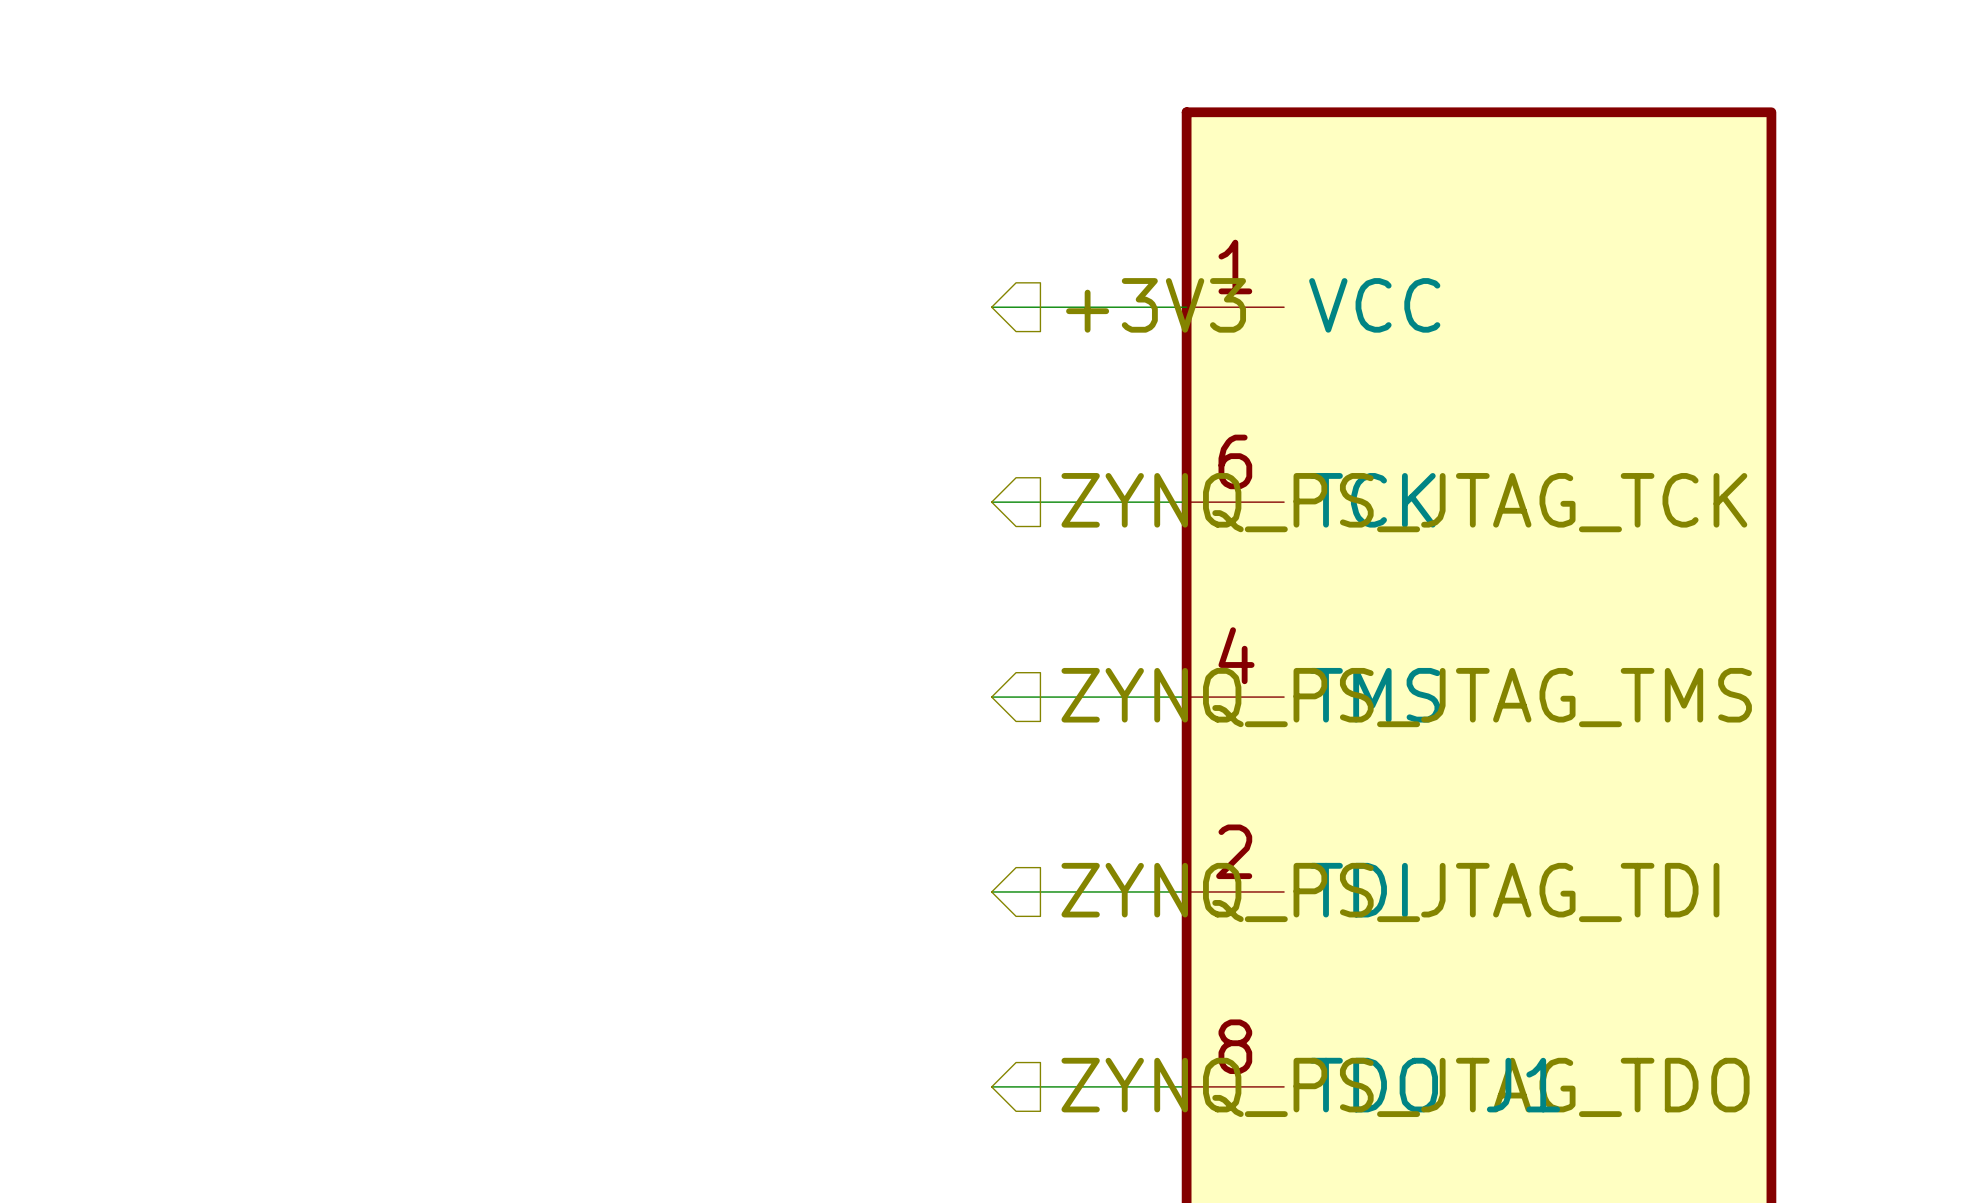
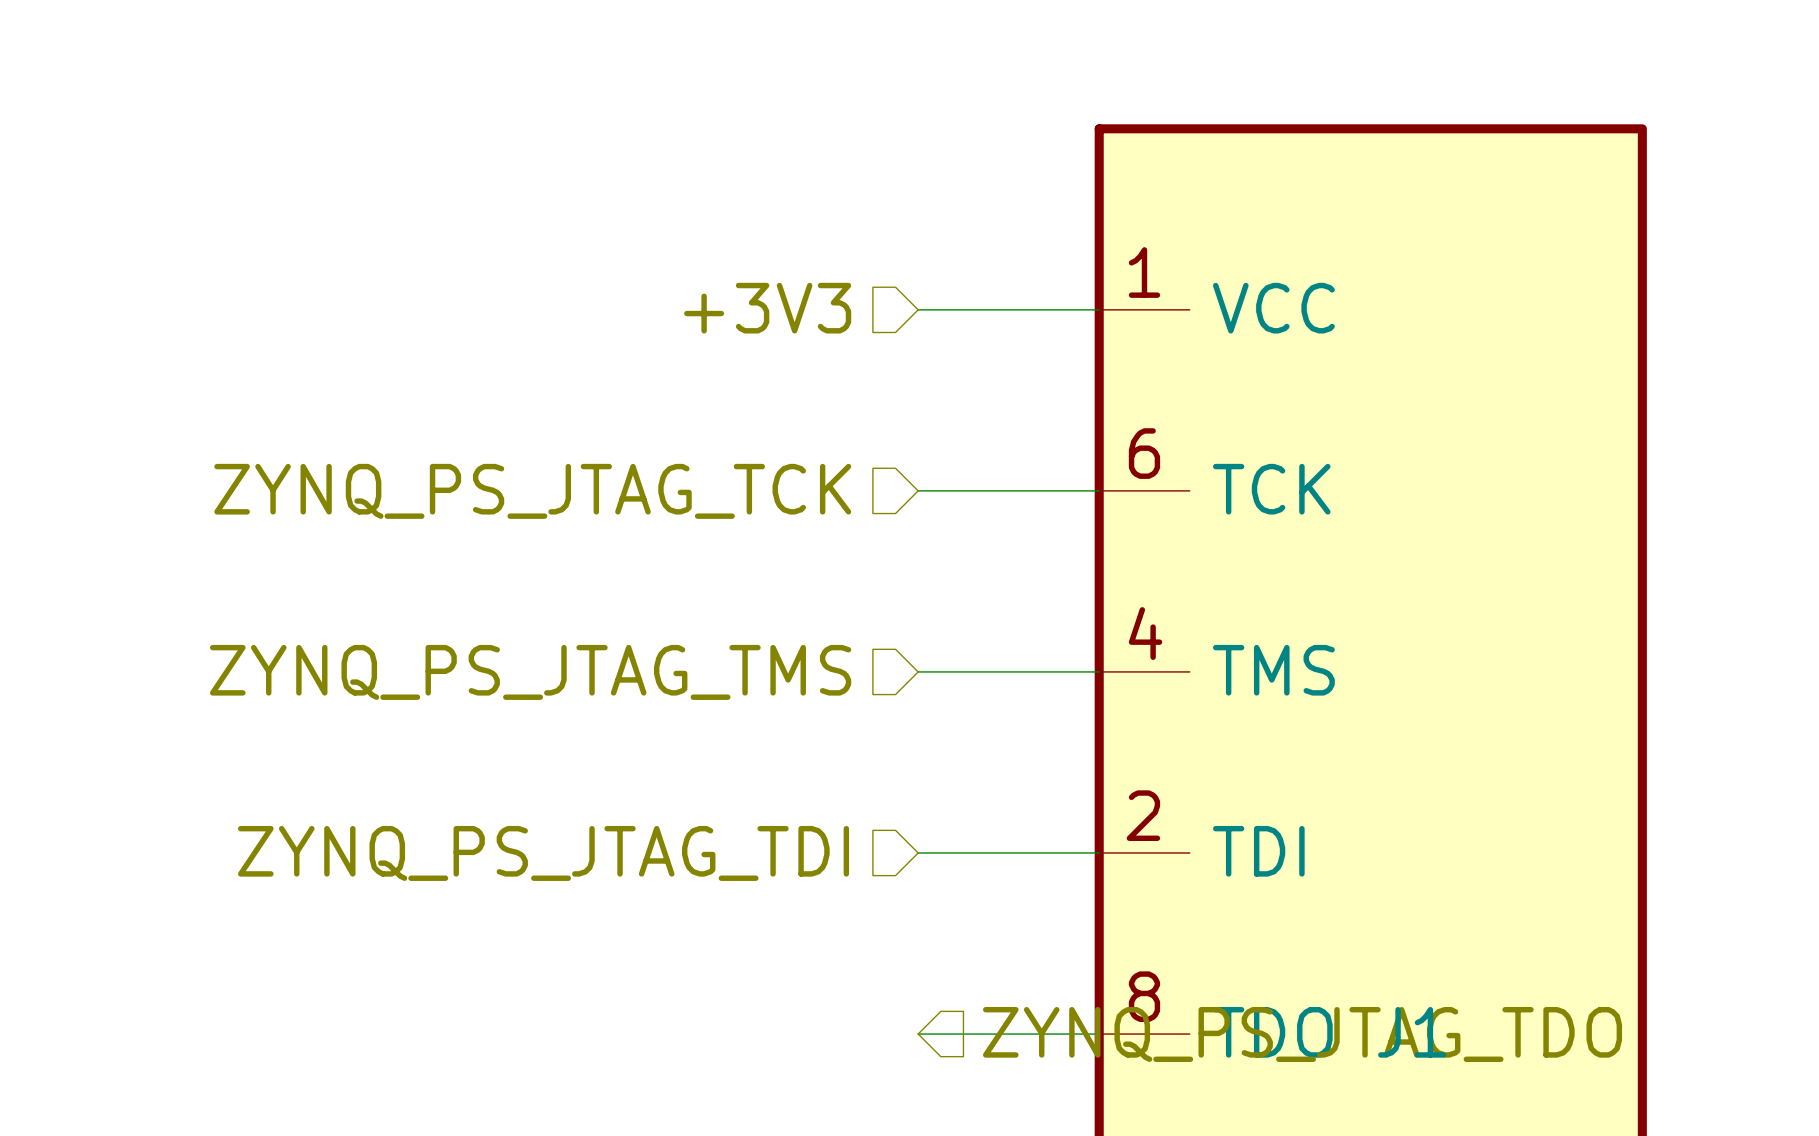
hierarchical label rotation: 0° (1156, 305) -> 180° (767, 308)
hierarchical label position: +3V3 (1156, 305) -> +3V3 (767, 308)
hierarchical label rotation: 0° (1404, 502) -> 180° (532, 491)
hierarchical label position: ZYNQ_PS_JTAG_TCK (1404, 502) -> ZYNQ_PS_JTAG_TCK (532, 491)
hierarchical label rotation: 0° (1406, 697) -> 180° (530, 672)
hierarchical label position: ZYNQ_PS_JTAG_TMS (1406, 697) -> ZYNQ_PS_JTAG_TMS (530, 672)
hierarchical label rotation: 0° (1390, 892) -> 180° (543, 853)
hierarchical label position: ZYNQ_PS_JTAG_TDI (1390, 892) -> ZYNQ_PS_JTAG_TDI (543, 853)

